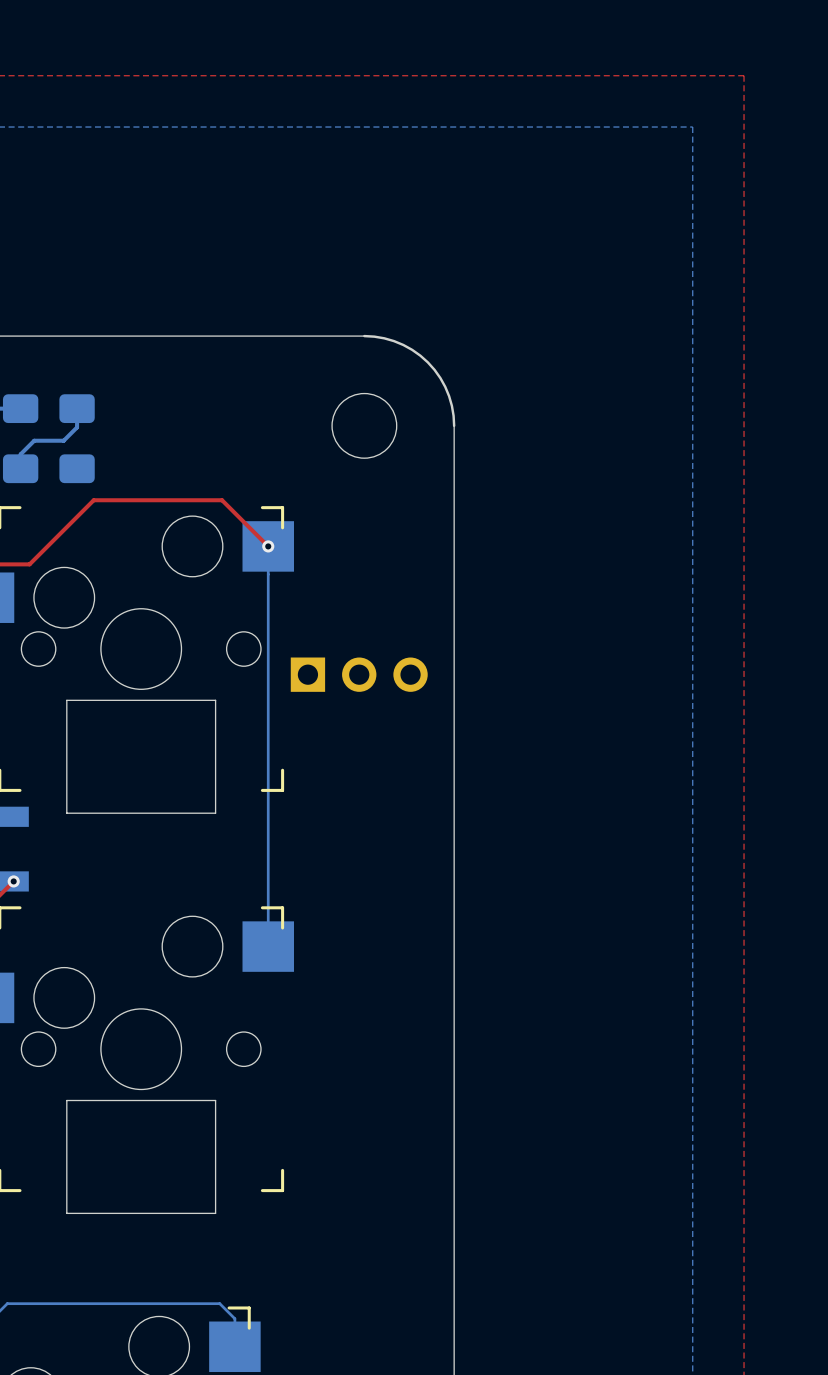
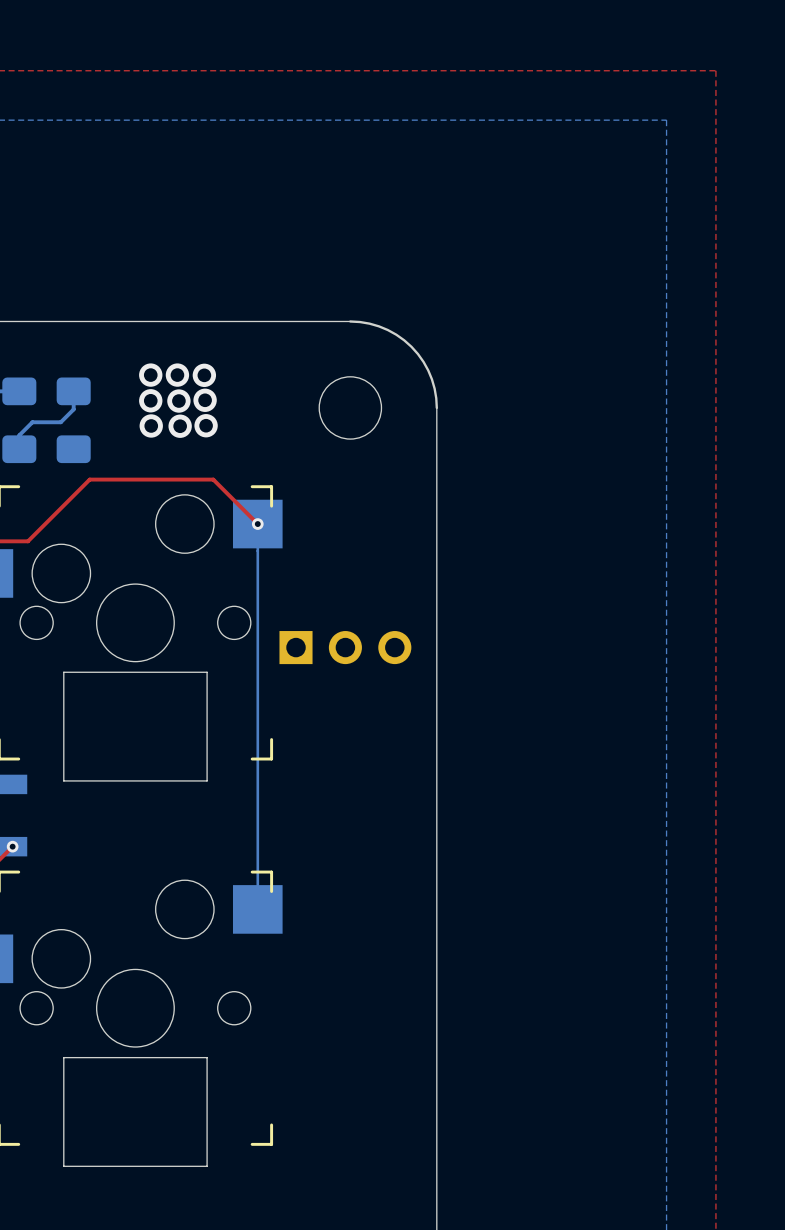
via: none -> (150, 375)
via: none -> (177, 375)
via: none -> (204, 375)
via: none -> (205, 400)
via: none -> (150, 400)
via: none -> (178, 401)
via: none -> (151, 425)
via: none -> (180, 426)
via: none -> (206, 425)

